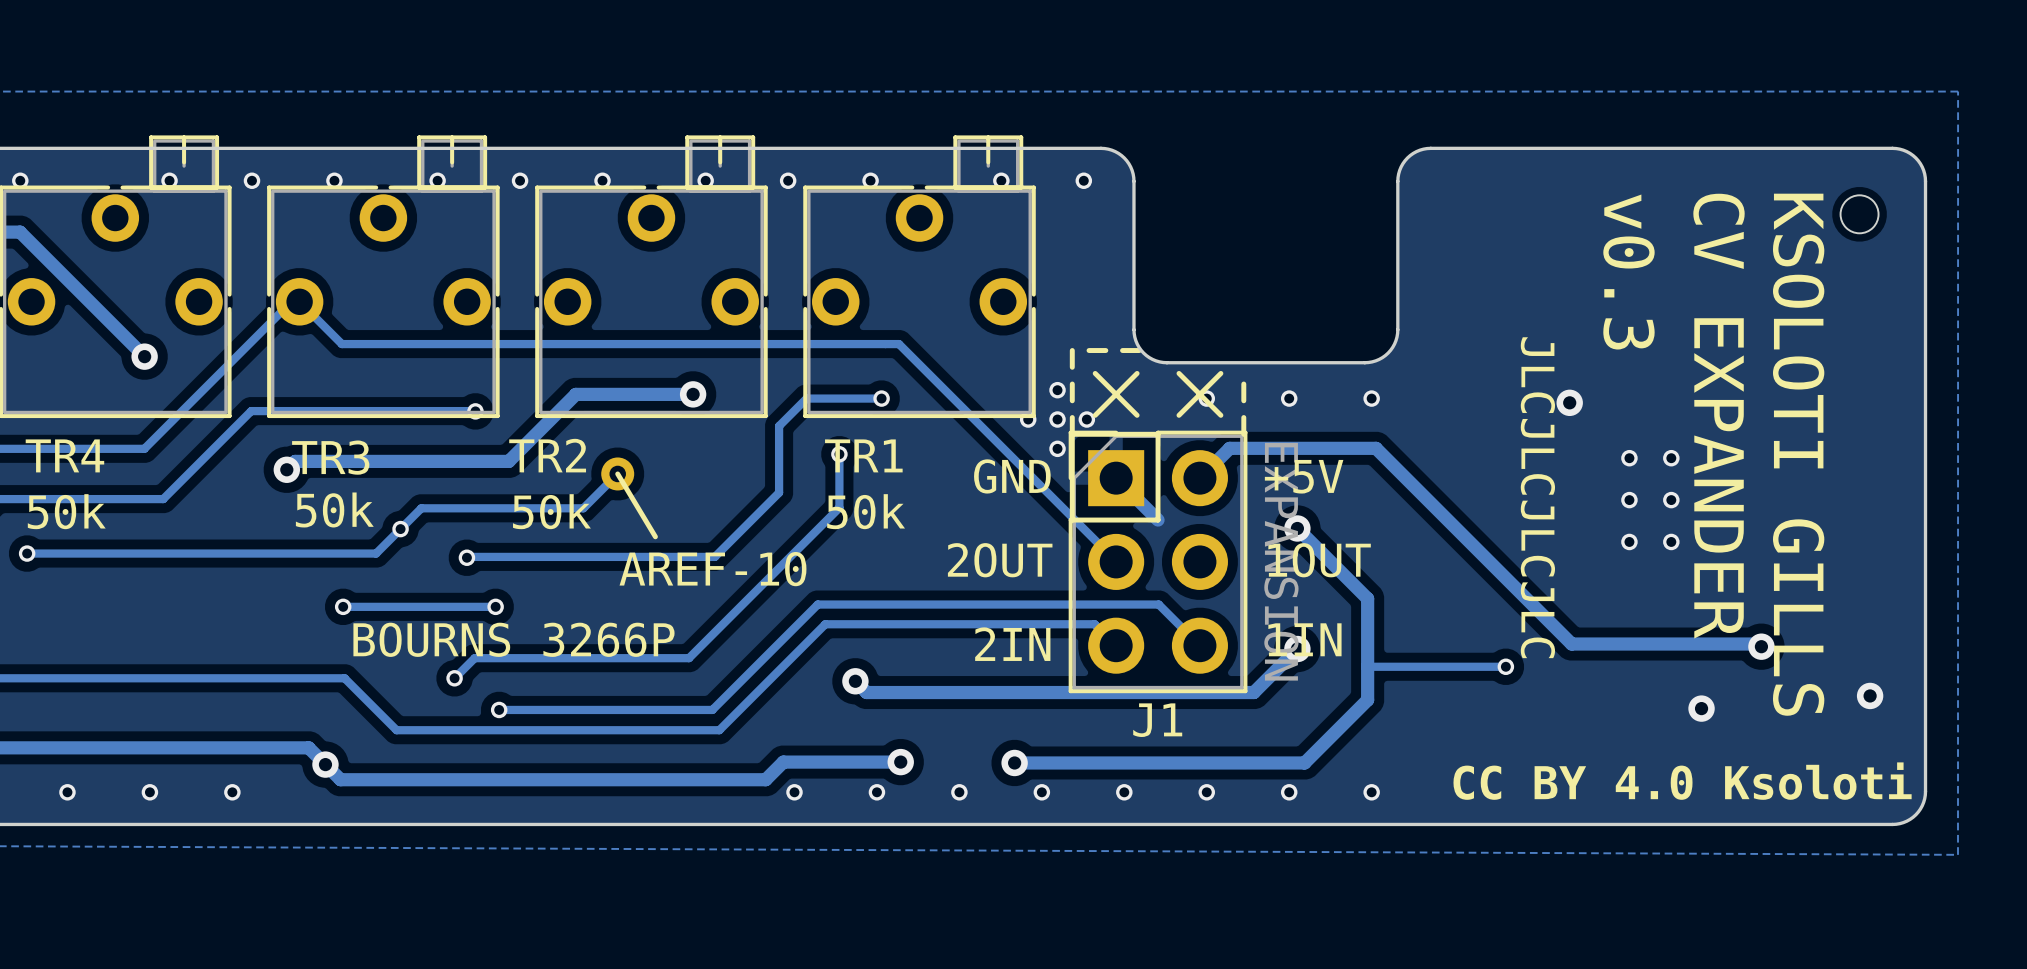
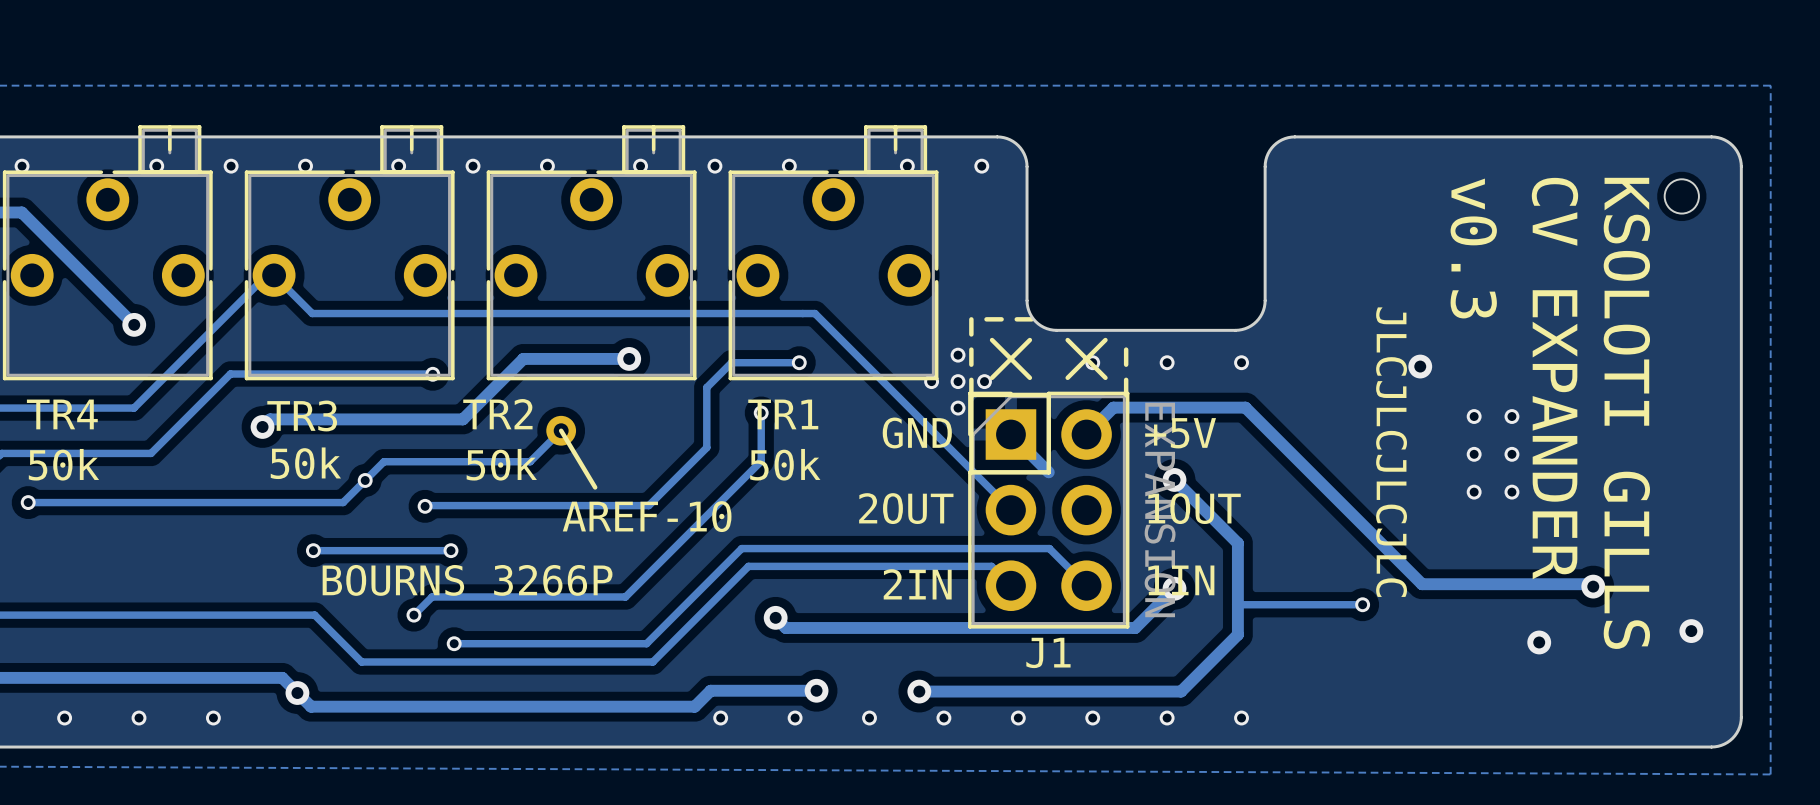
text: CC BY 4.0 Ksoloti (1682, 781) -> none

